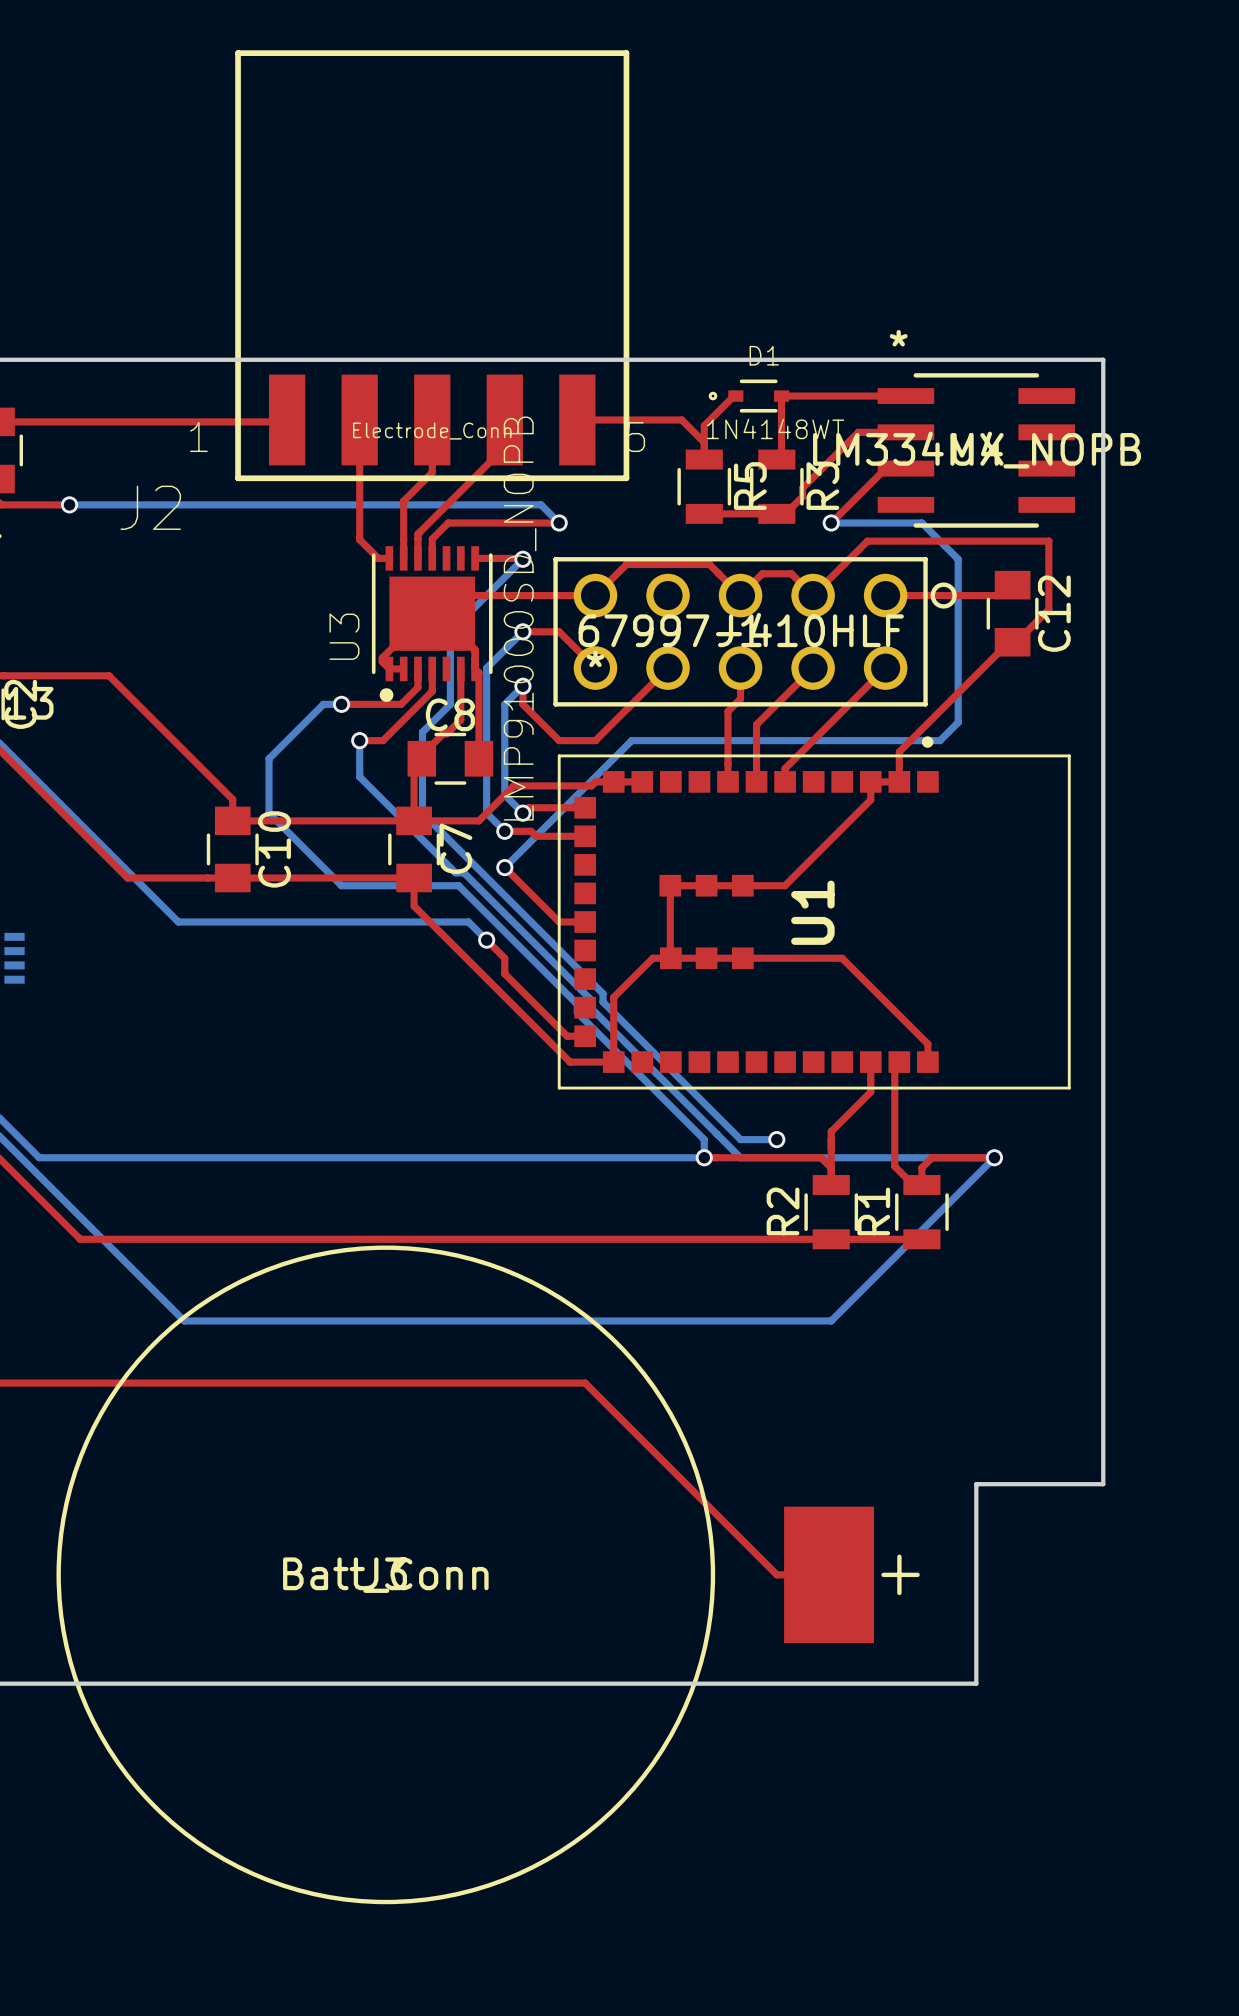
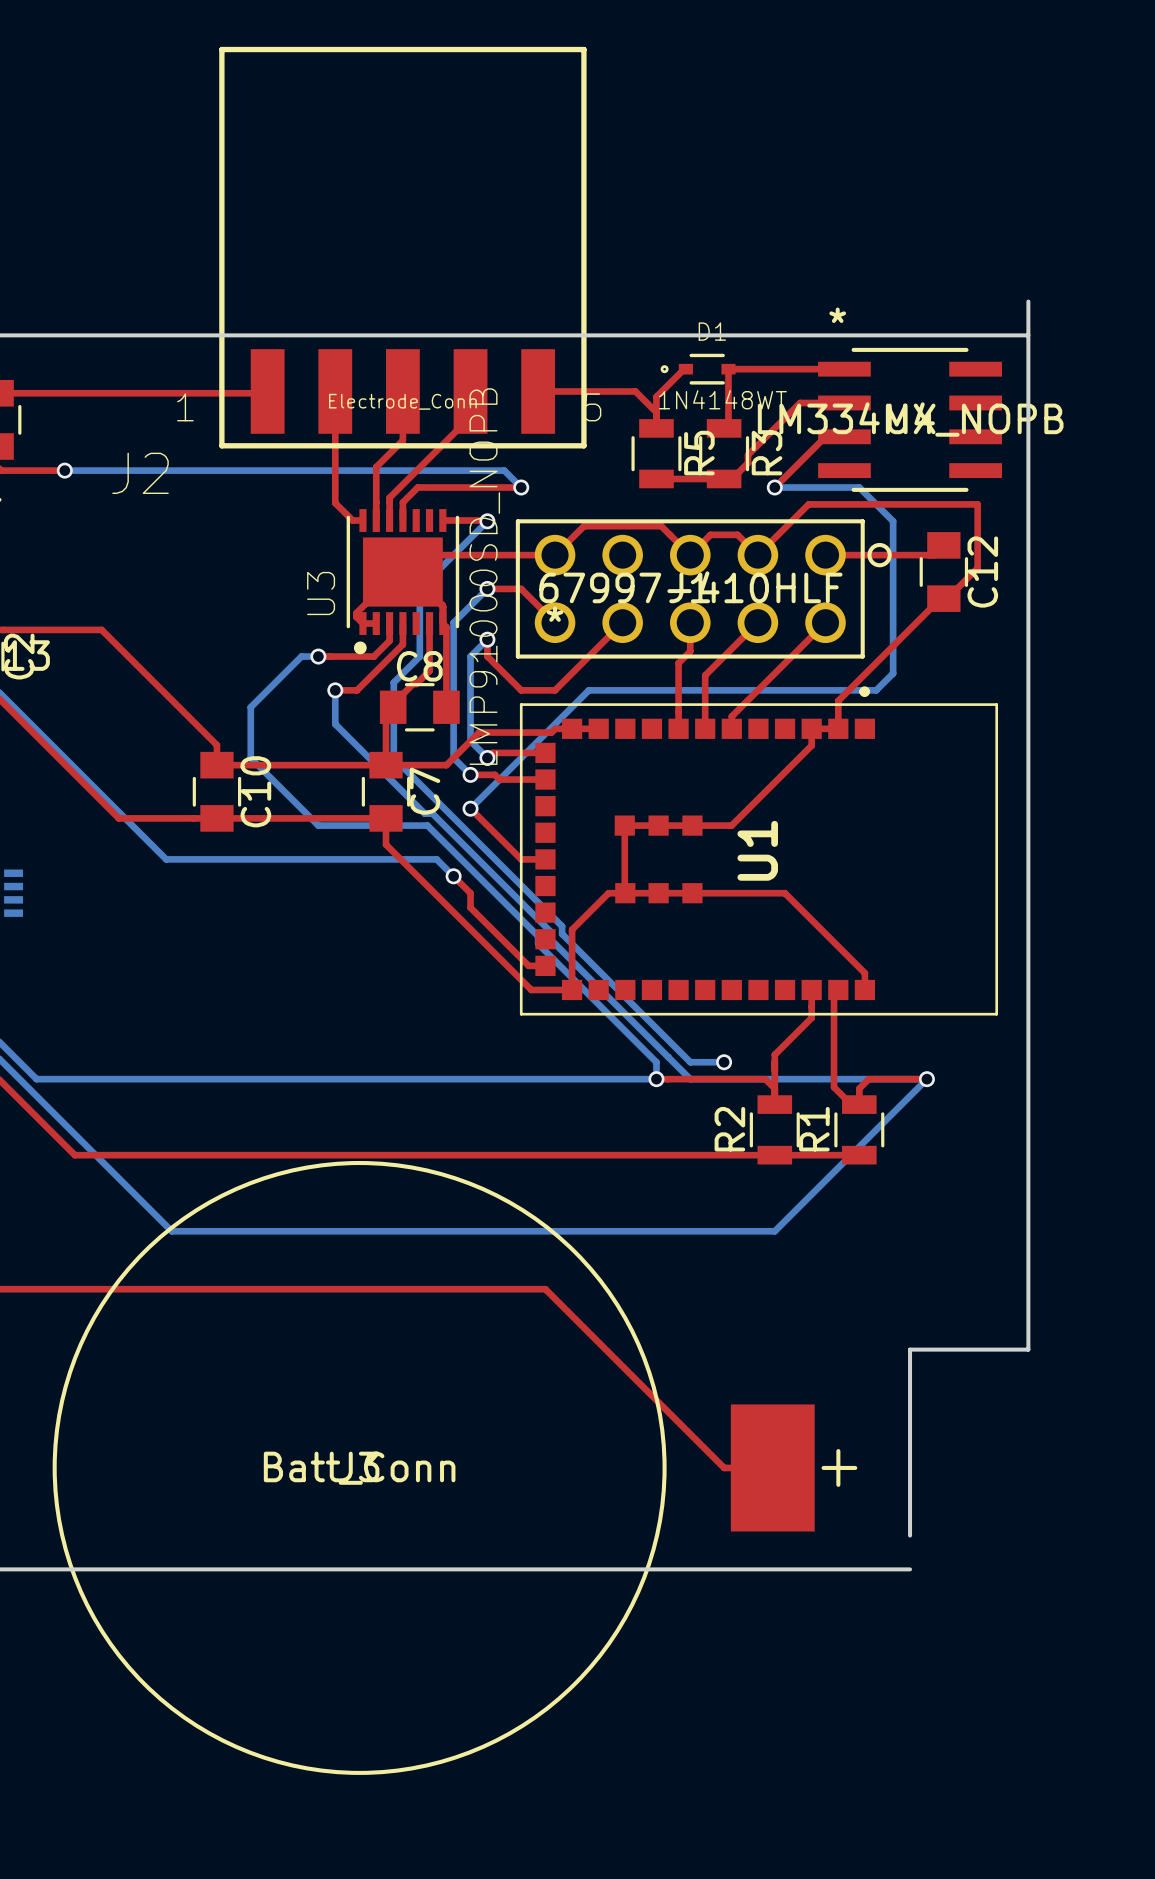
board edge: none -> (1028, 301) (1028, 335)
board edge: (1103, 1447) (1103, 1484) (976, 1484) -> (1028, 1349) (910, 1349) (910, 1383)
board edge: (976, 1647) (976, 1683) -> none

